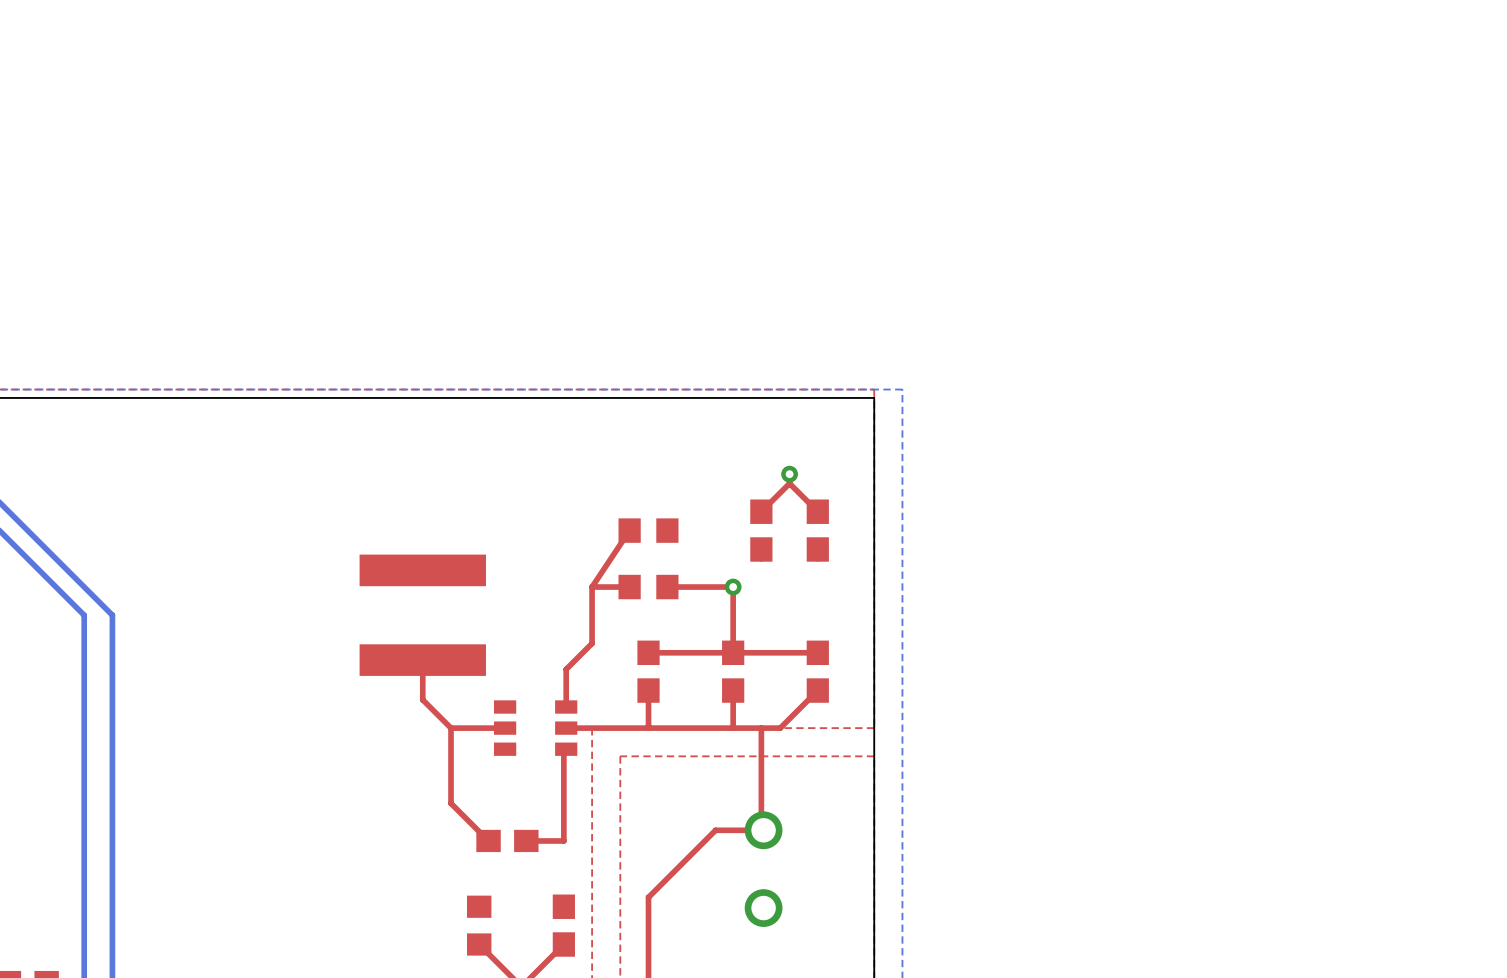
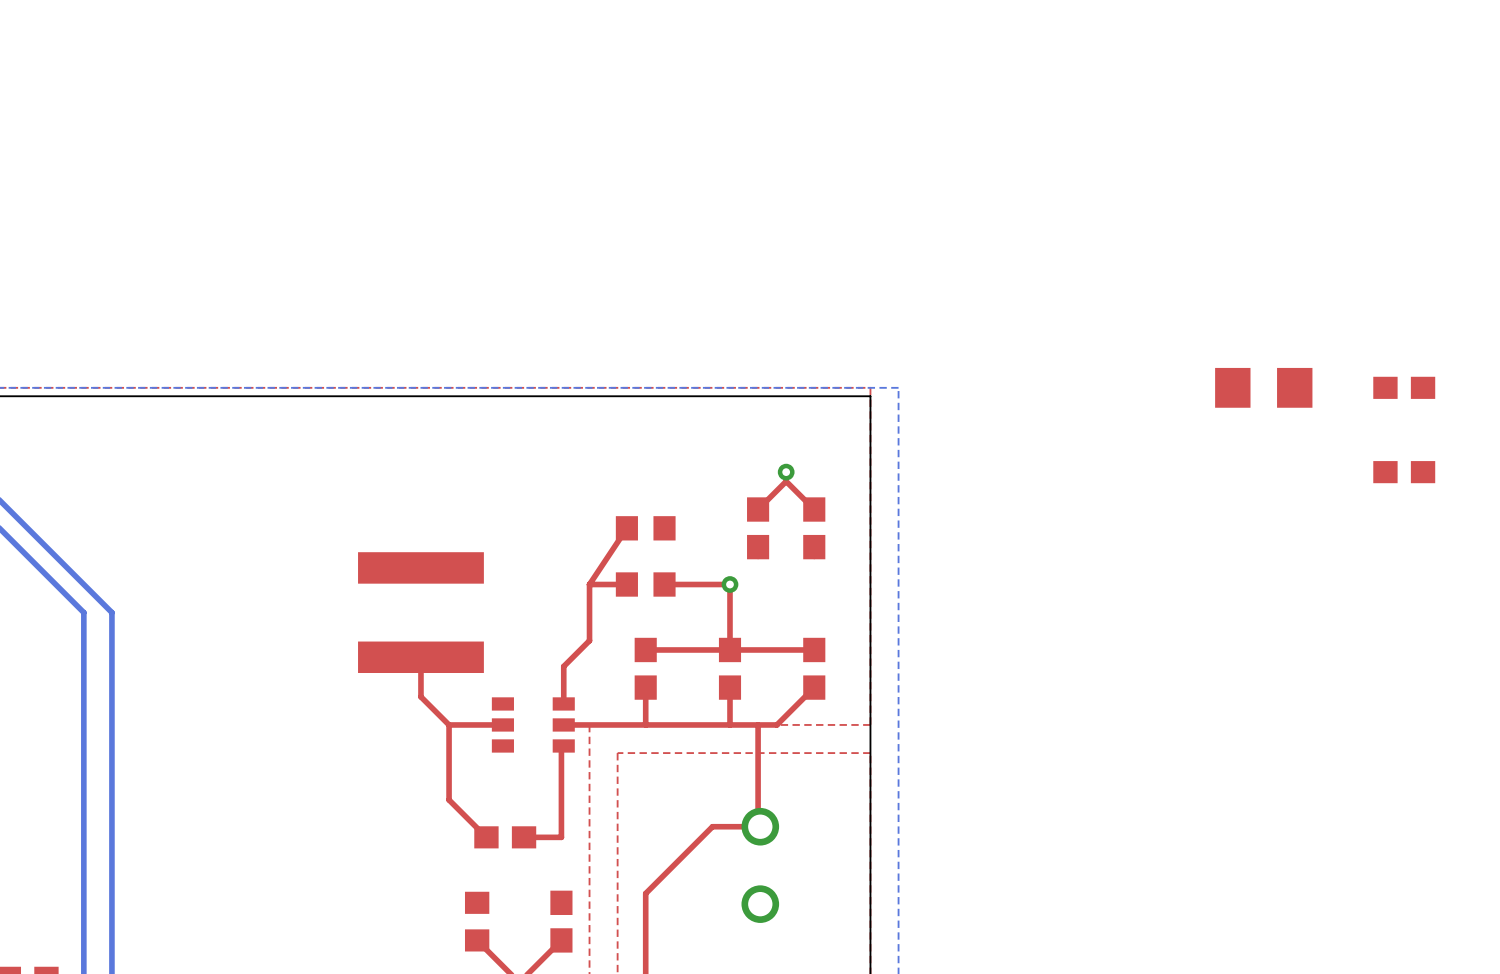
part: none -> (1263, 387)
part: none -> (1404, 387)
part: none -> (1404, 472)

